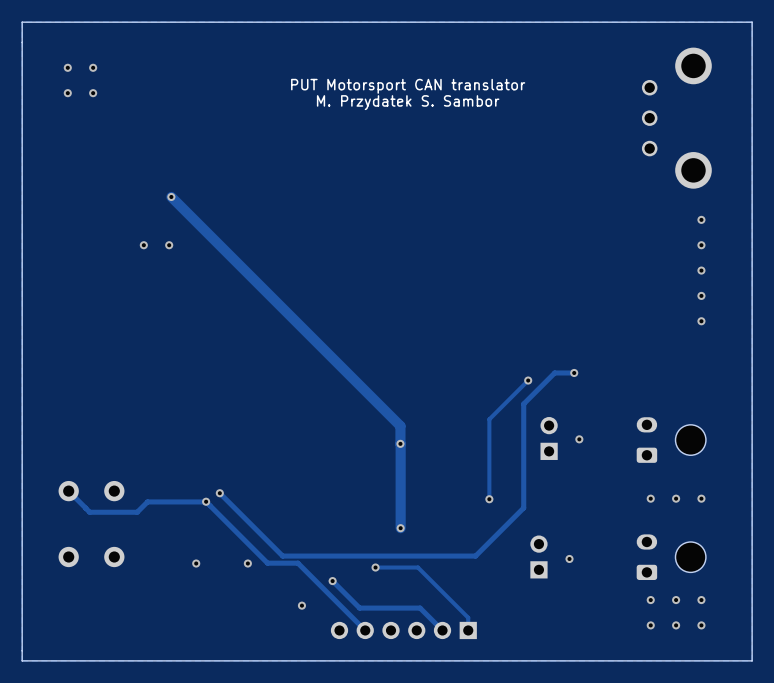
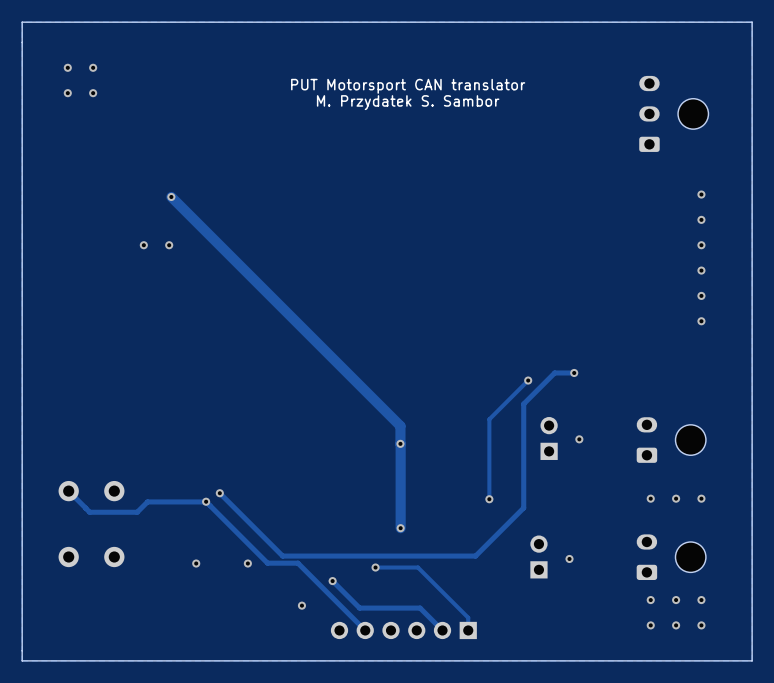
part footprint: [641, 47, 712, 189] -> [639, 75, 709, 152]
via: none -> (701, 194)

